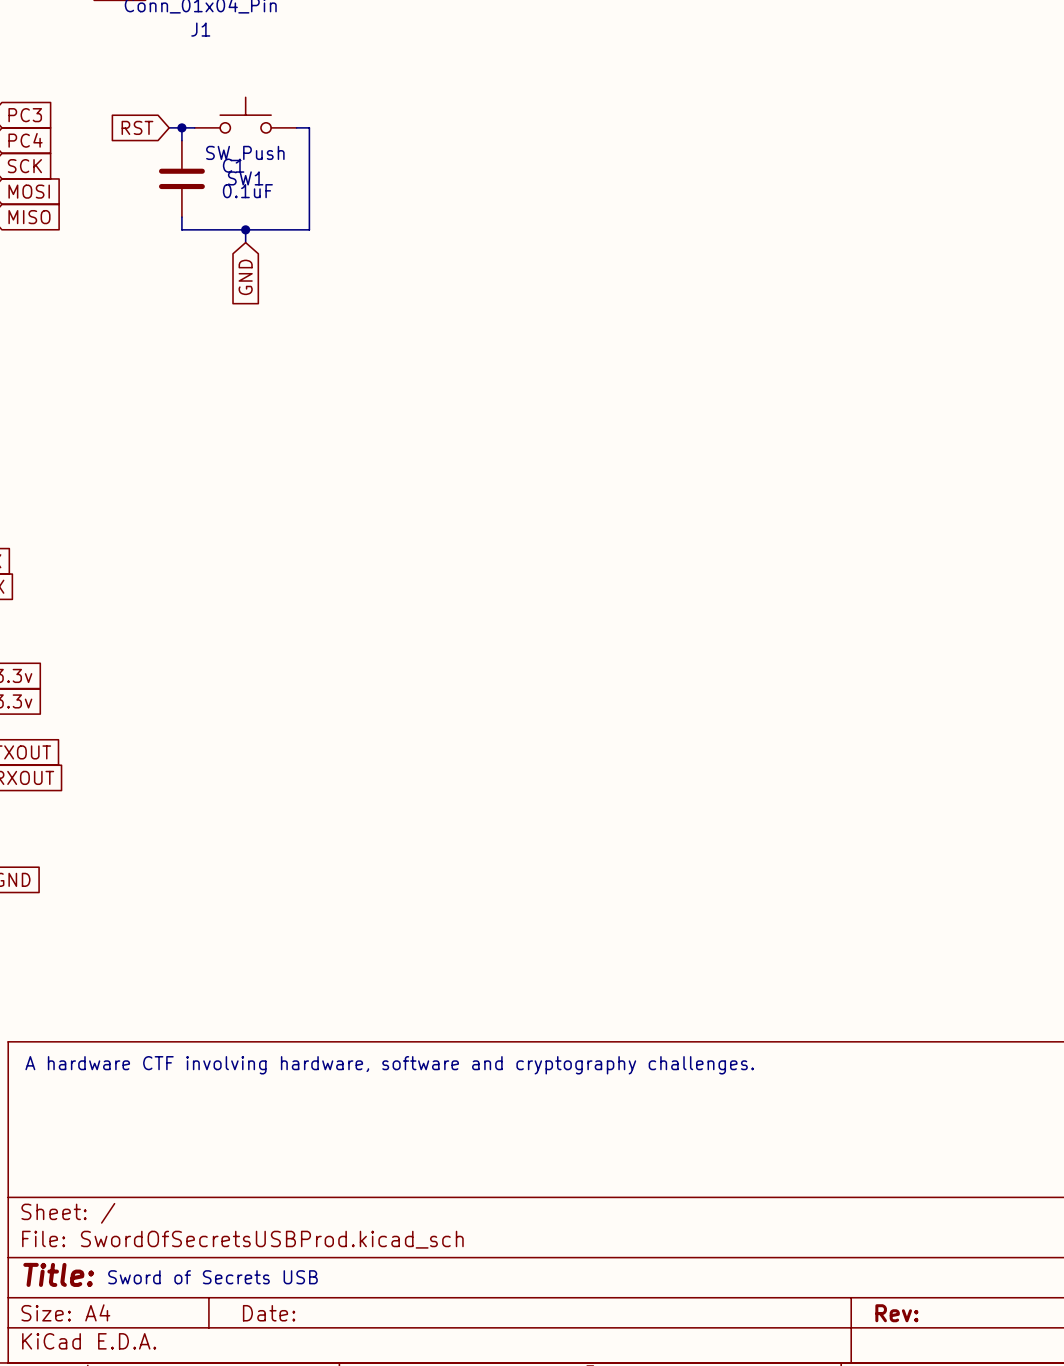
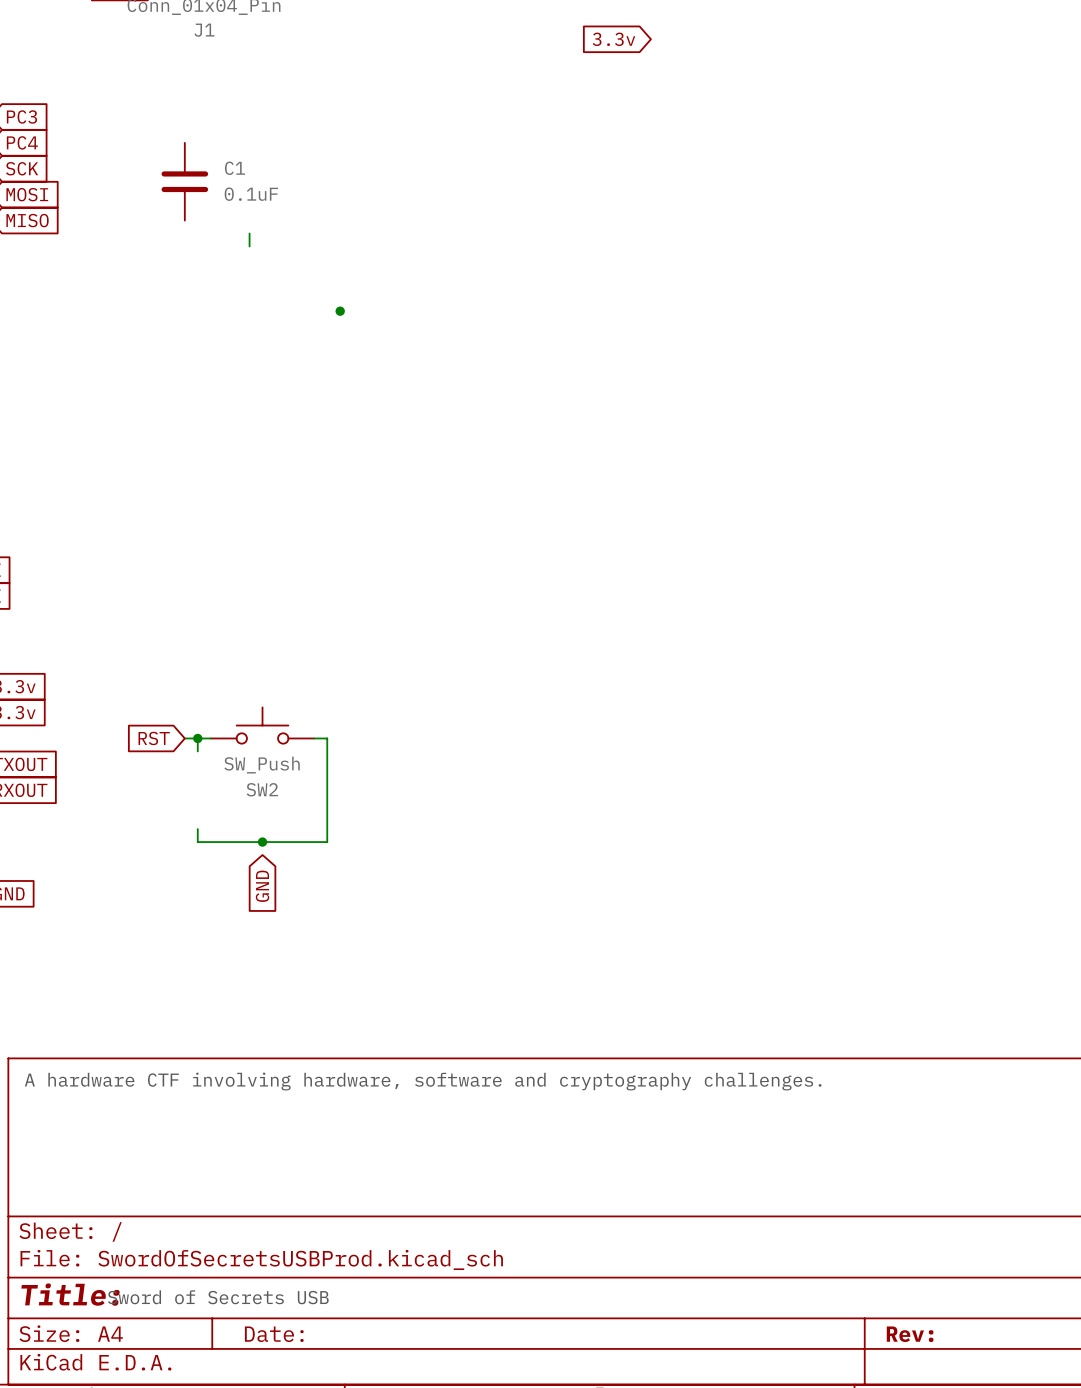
global label: none -> 3.3v (613, 39)
SW1: SW_Push (245, 115) -> none
global label: RST (137, 127) -> none
wire: (169, 127) (194, 127) -> none
wire: (181, 127) (181, 140) -> none
junction: (181, 127) -> none
wire: (296, 127) (309, 127) (309, 229) (181, 229) (181, 217) -> none
junction: (245, 229) -> none
global label: GND (245, 277) -> none
junction: none -> (340, 311)
SW2: none -> SW_Push (262, 725)
global label: none -> RST (154, 738)
wire: none -> (184, 738) (210, 738)
wire: none -> (197, 738) (197, 751)
junction: none -> (197, 738)
wire: none -> (314, 738) (327, 738) (327, 842) (197, 842) (197, 829)
junction: none -> (262, 842)
global label: none -> GND (262, 886)

